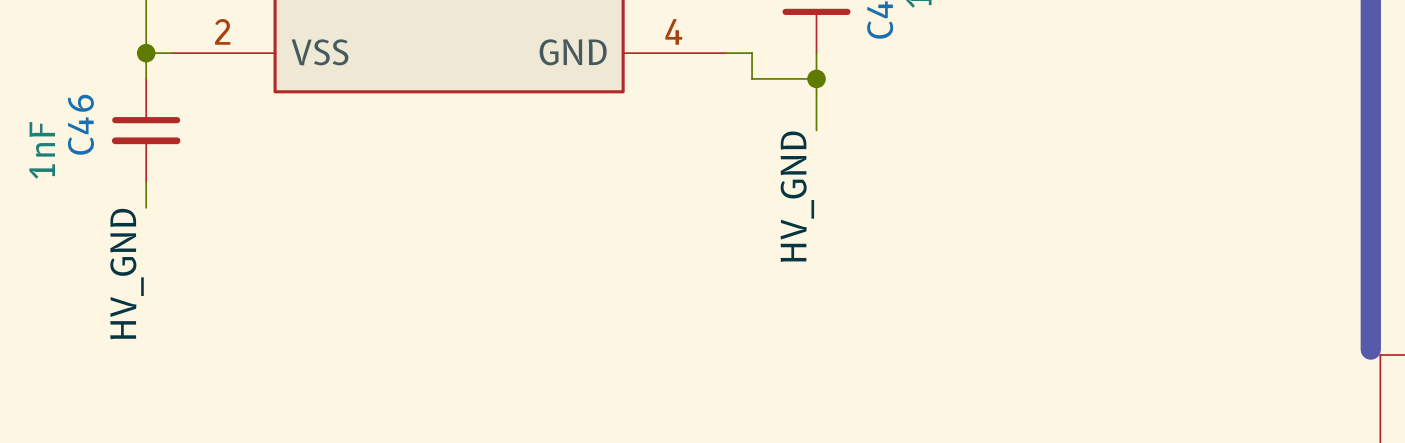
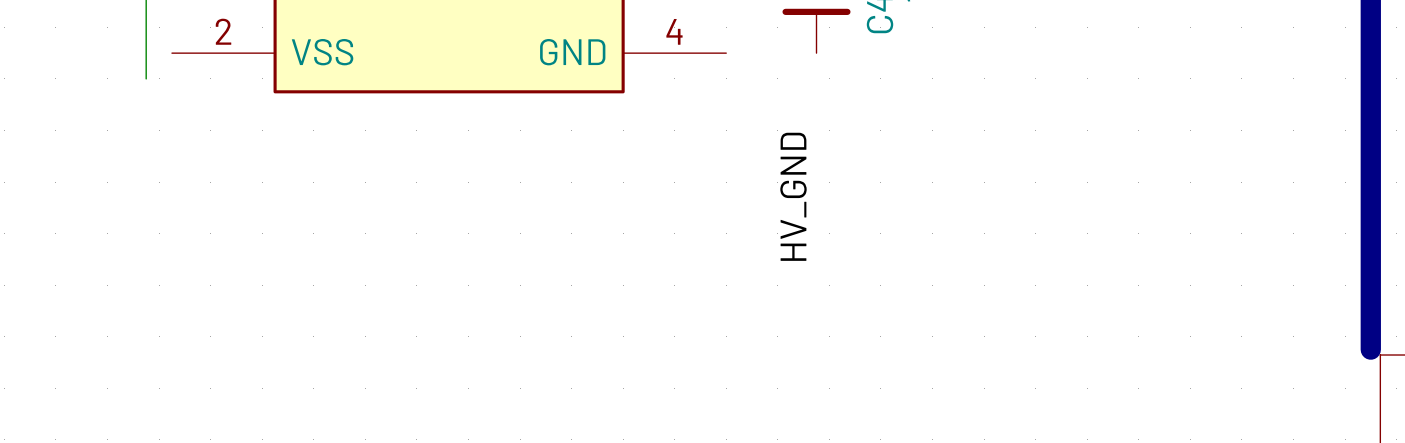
wire: (146, 53) (171, 53) -> none
junction: (146, 53) -> none
wire: (726, 53) (752, 53) (752, 78) (816, 78) -> none
wire: (816, 53) (816, 130) -> none
junction: (816, 78) -> none
C46: 1nF (146, 130) -> none
wire: (146, 182) (146, 207) -> none
label: HV_GND (127, 274) -> none

